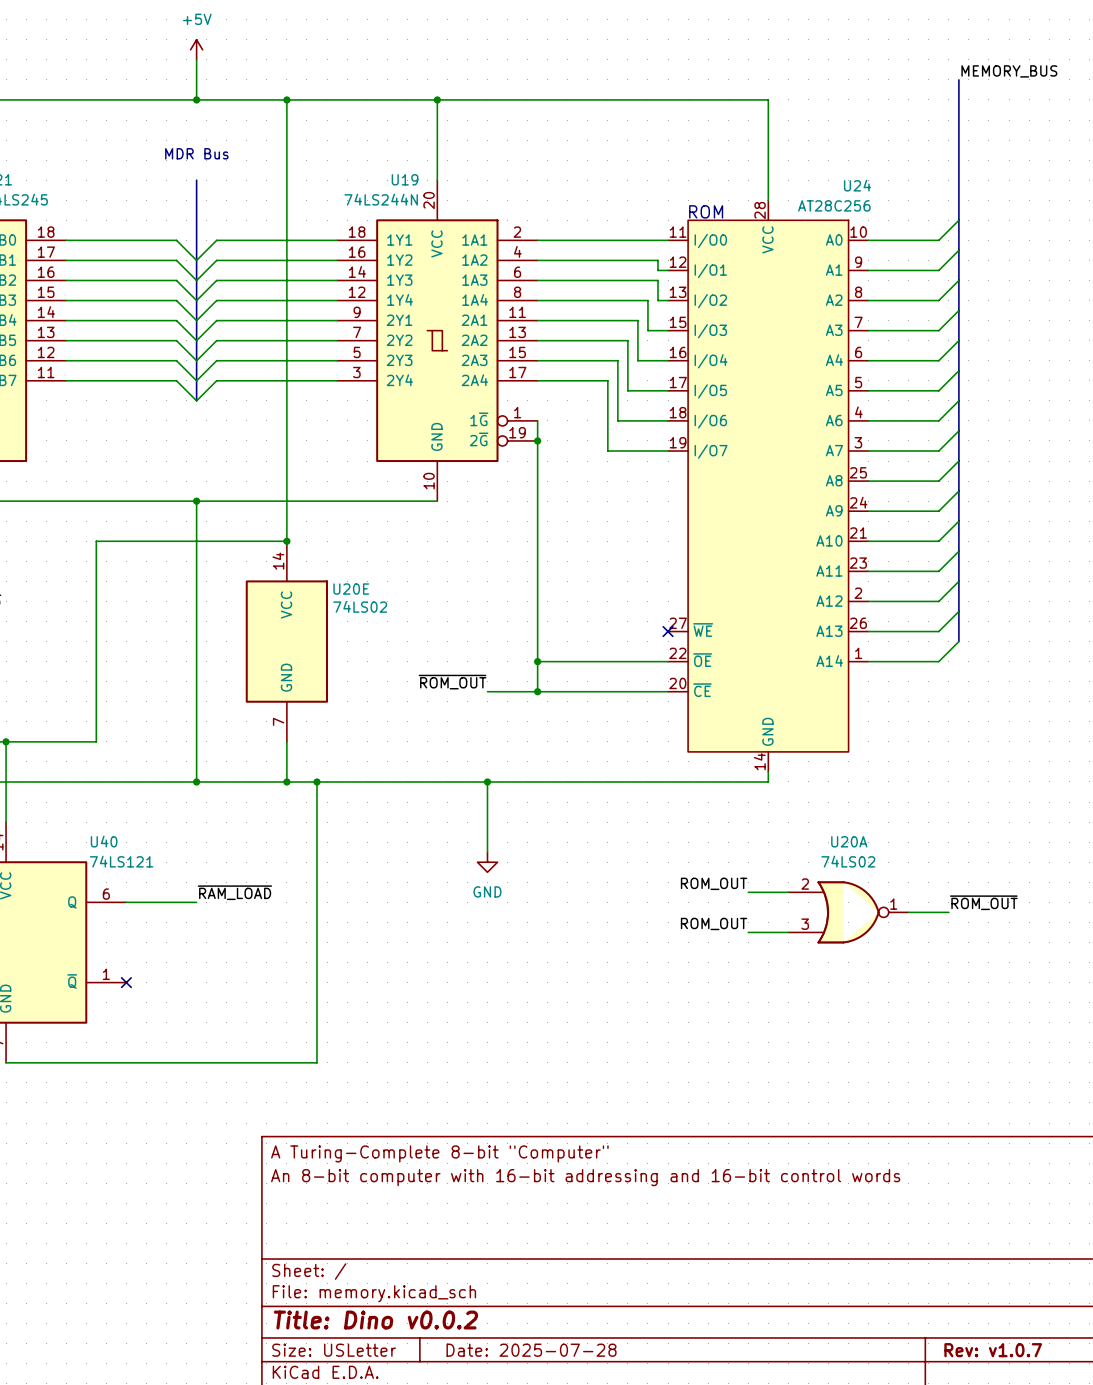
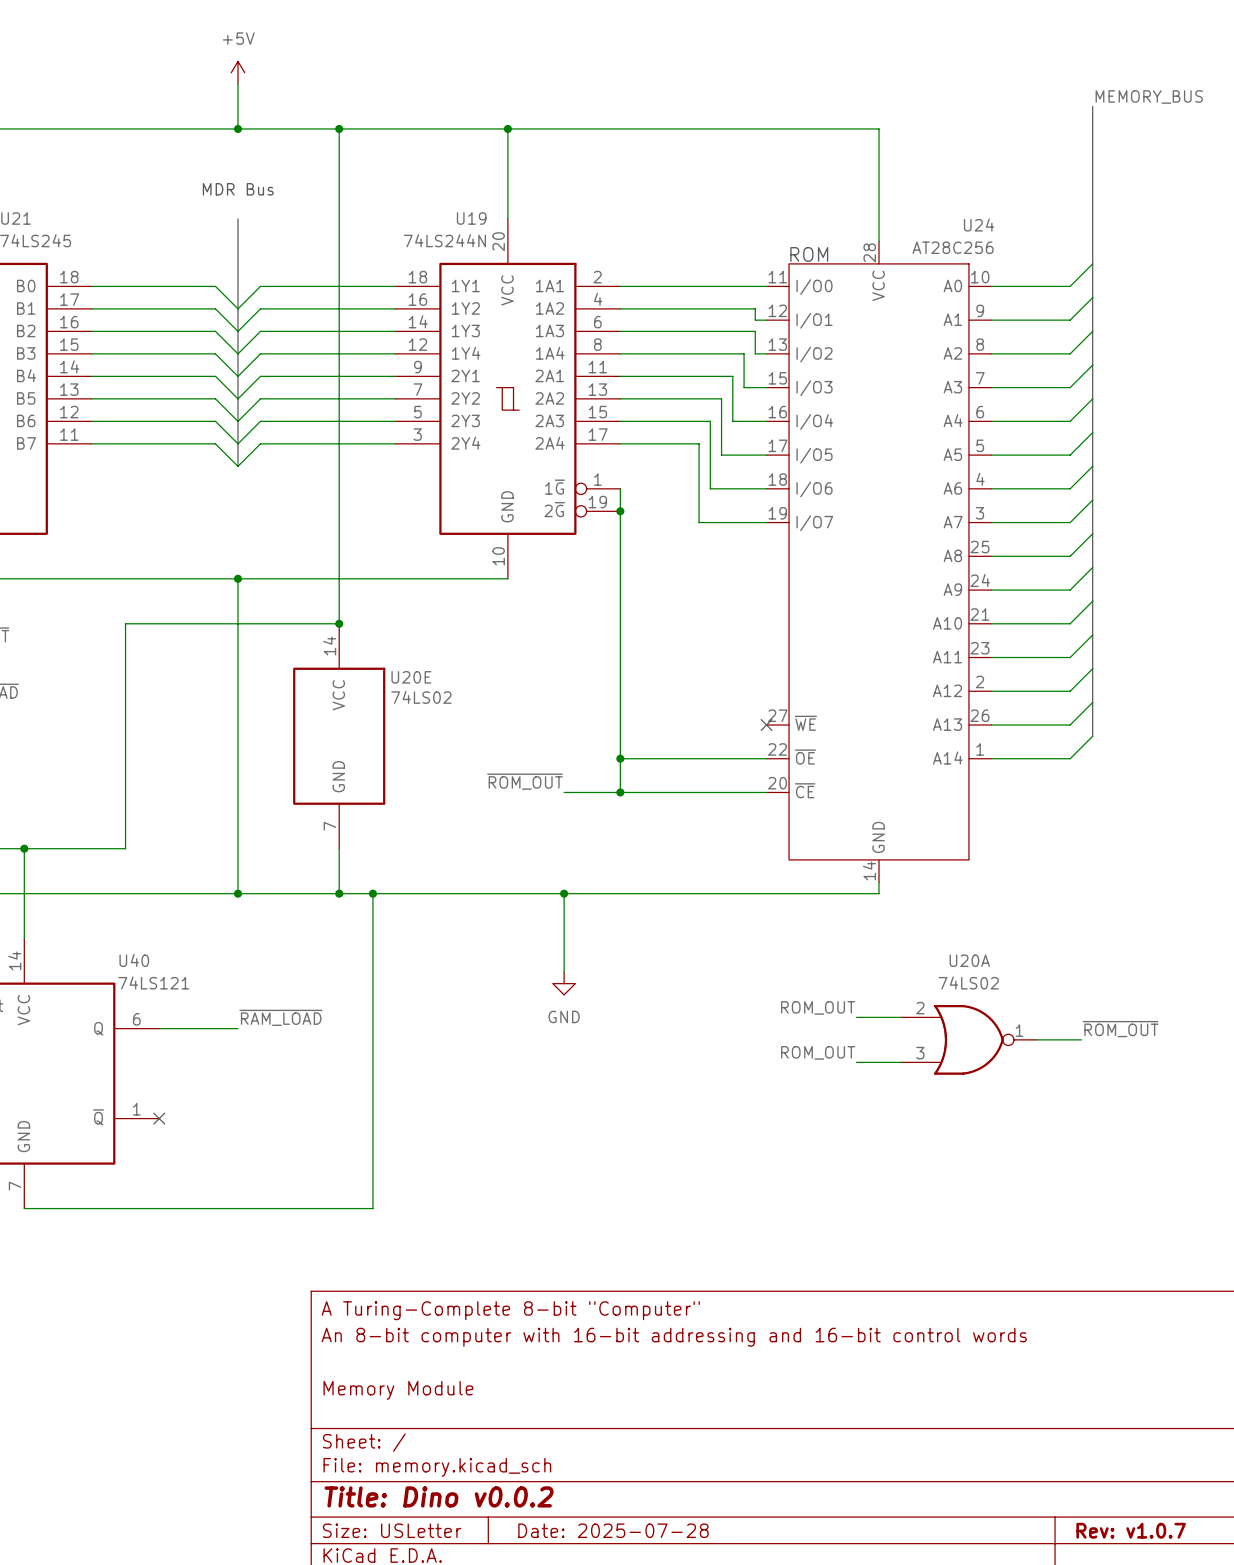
title block: none -> Memory Module (398, 1390)

